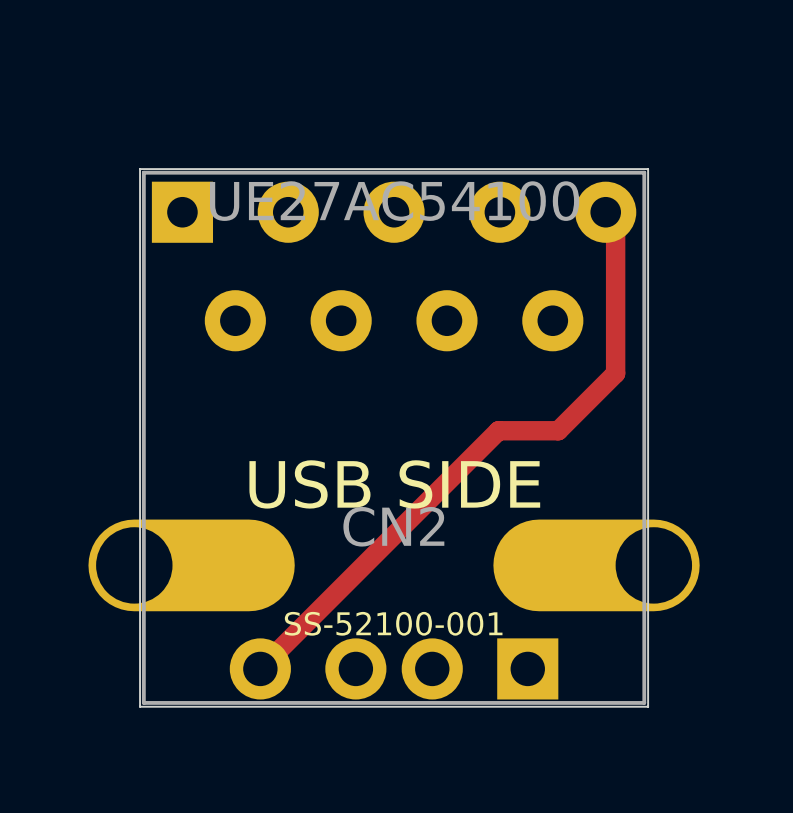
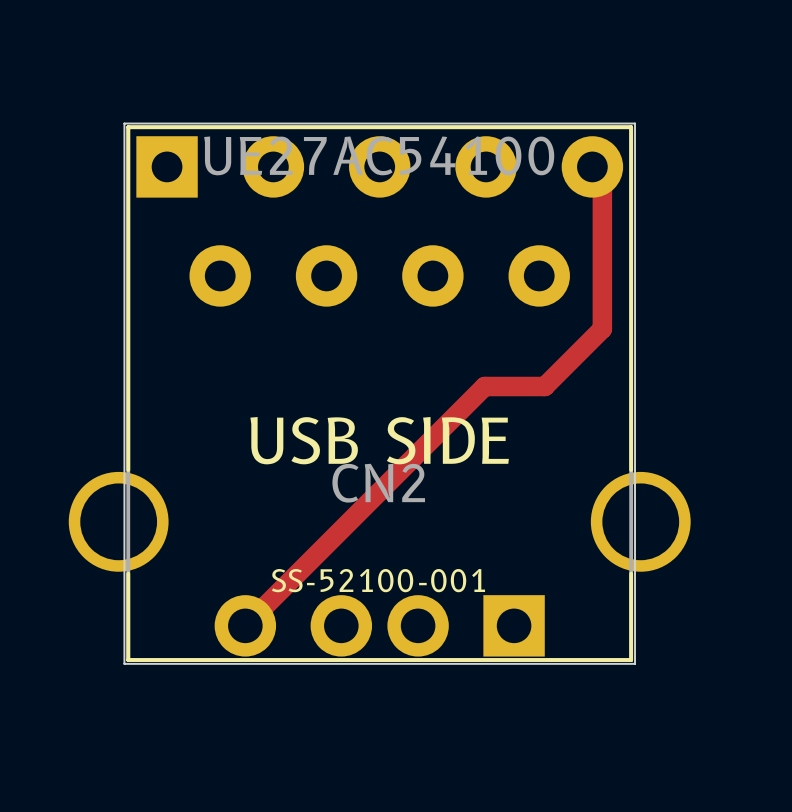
CN2 footprint: [88, 170, 700, 705] -> [68, 125, 691, 662]

